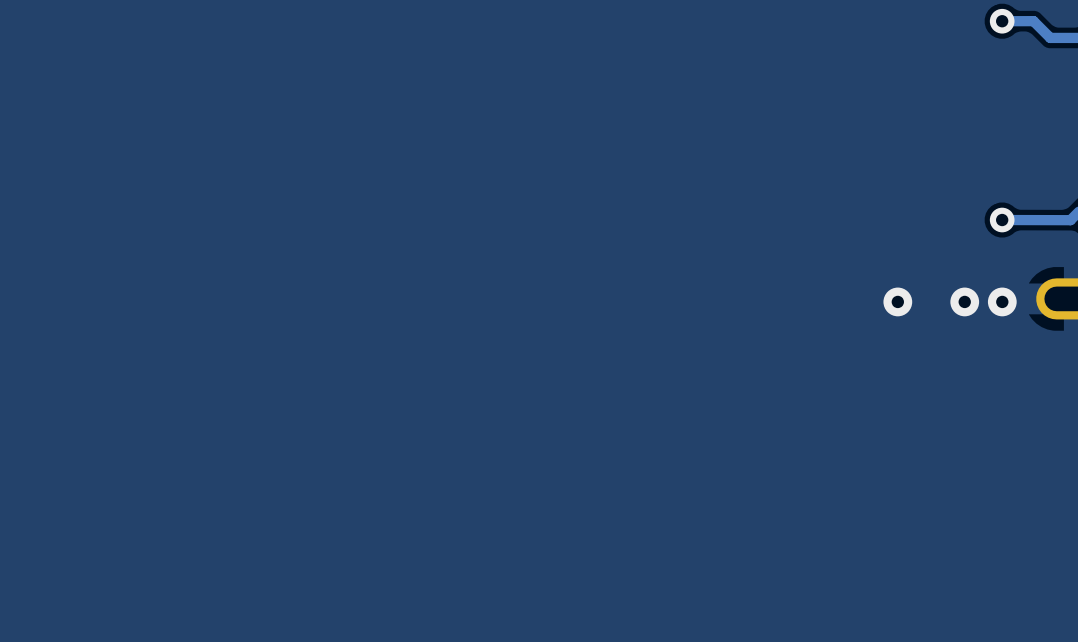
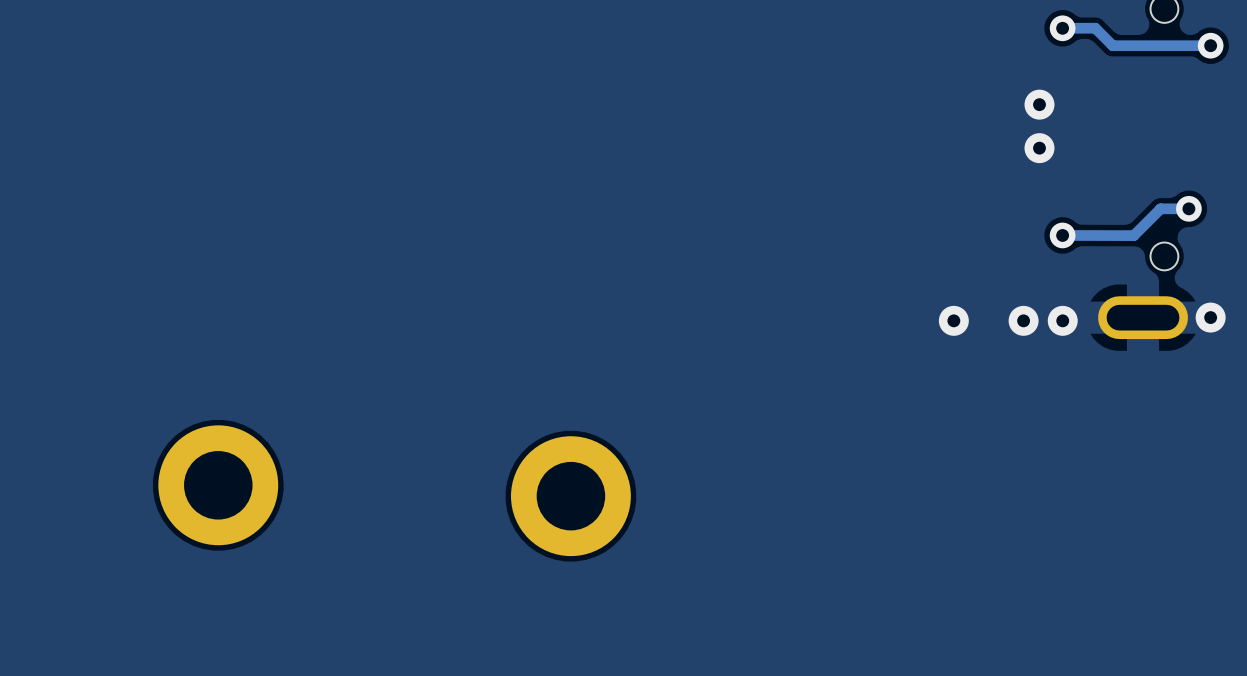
via: none -> (1039, 104)
via: none -> (1039, 148)
part: none -> (218, 485)
part: none -> (570, 496)

